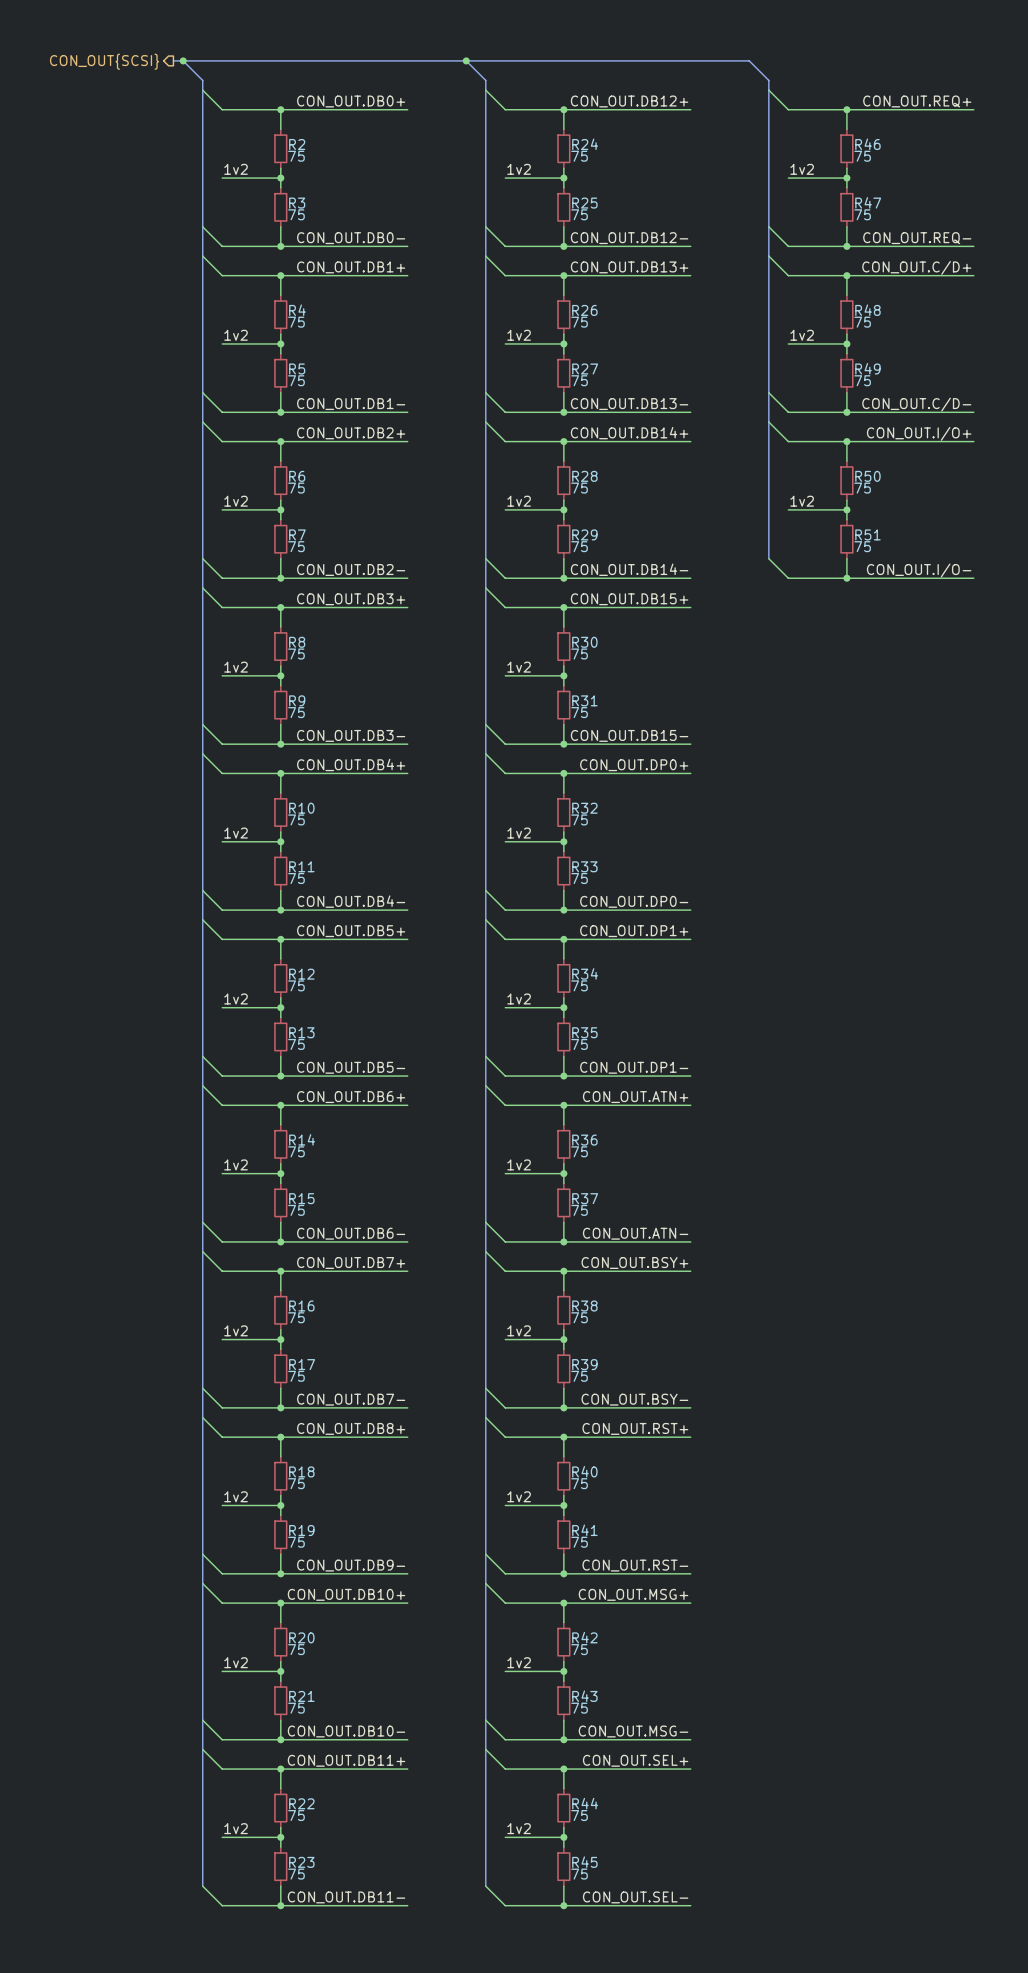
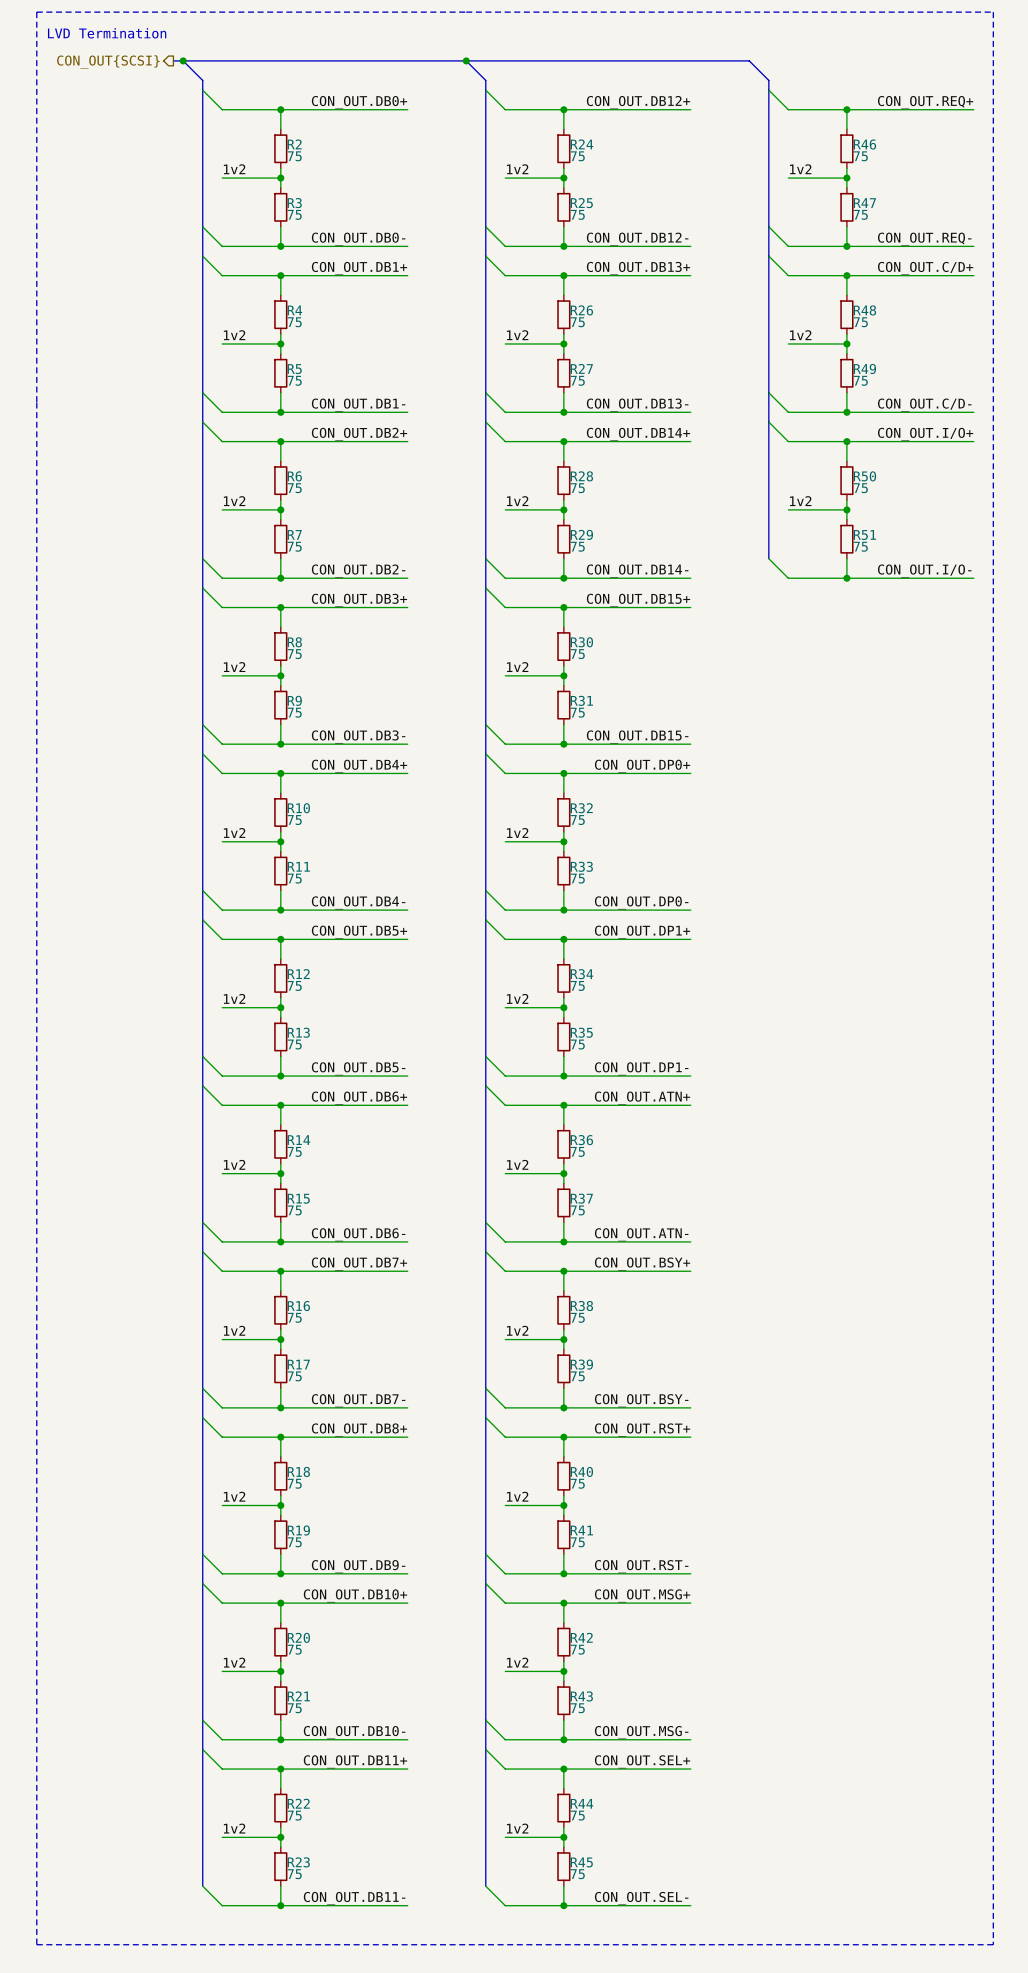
line: none -> (36, 12) (36, 1944) (993, 1944) (993, 12) (36, 12)
text: none -> LVD Termination (107, 33)

